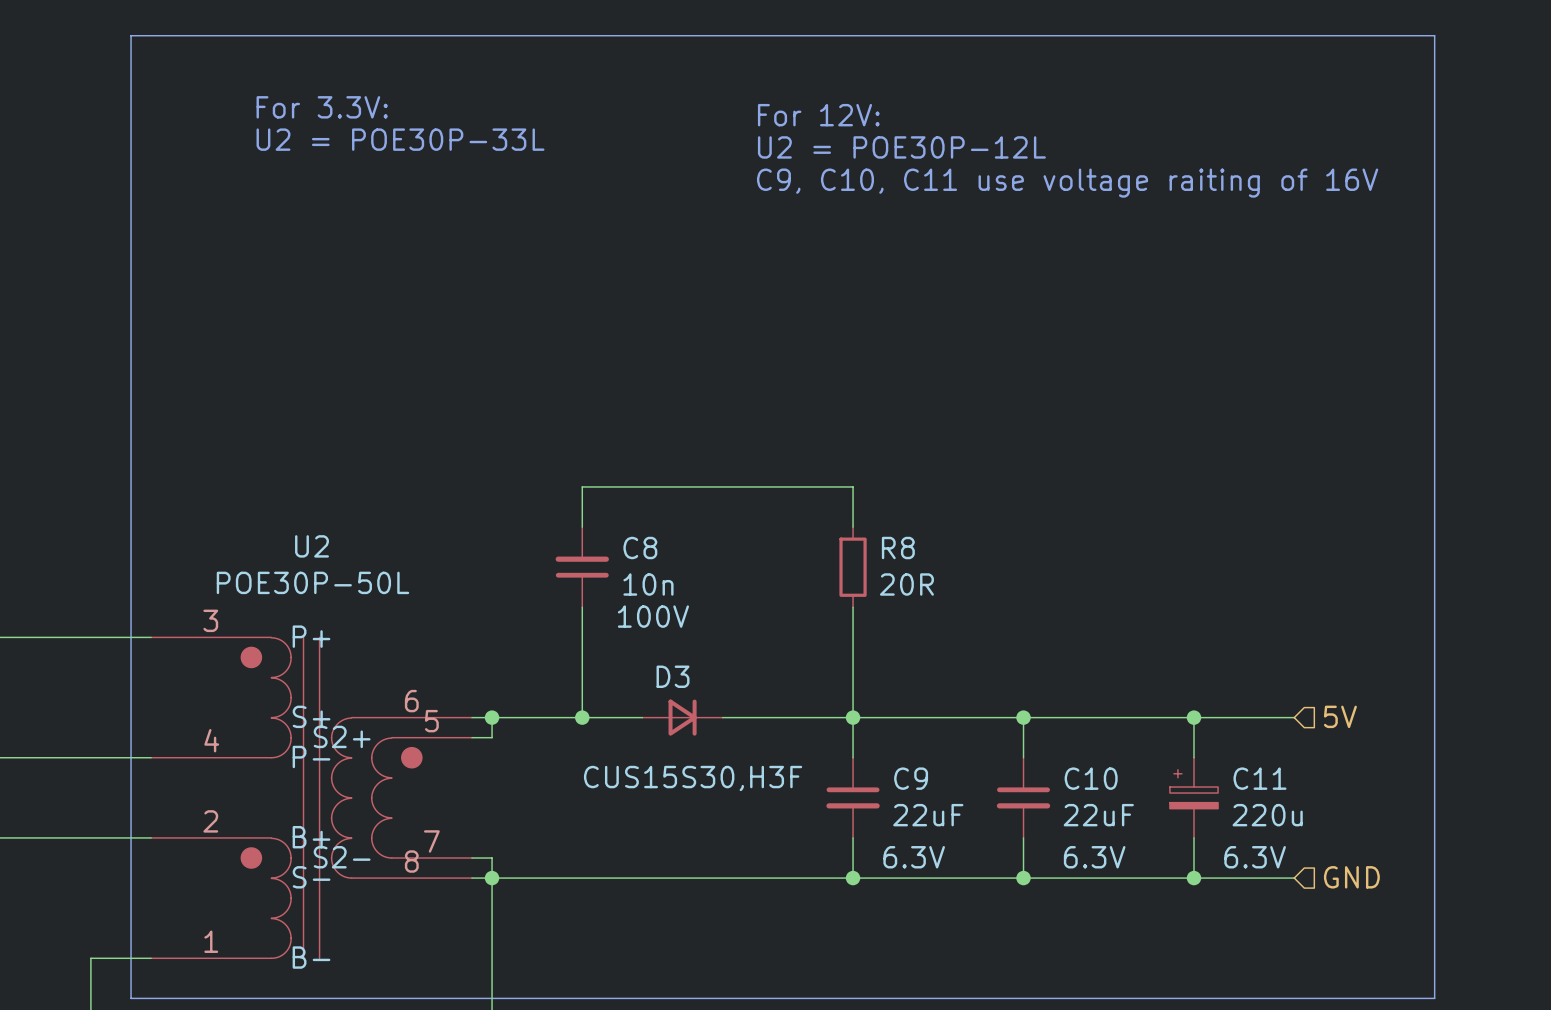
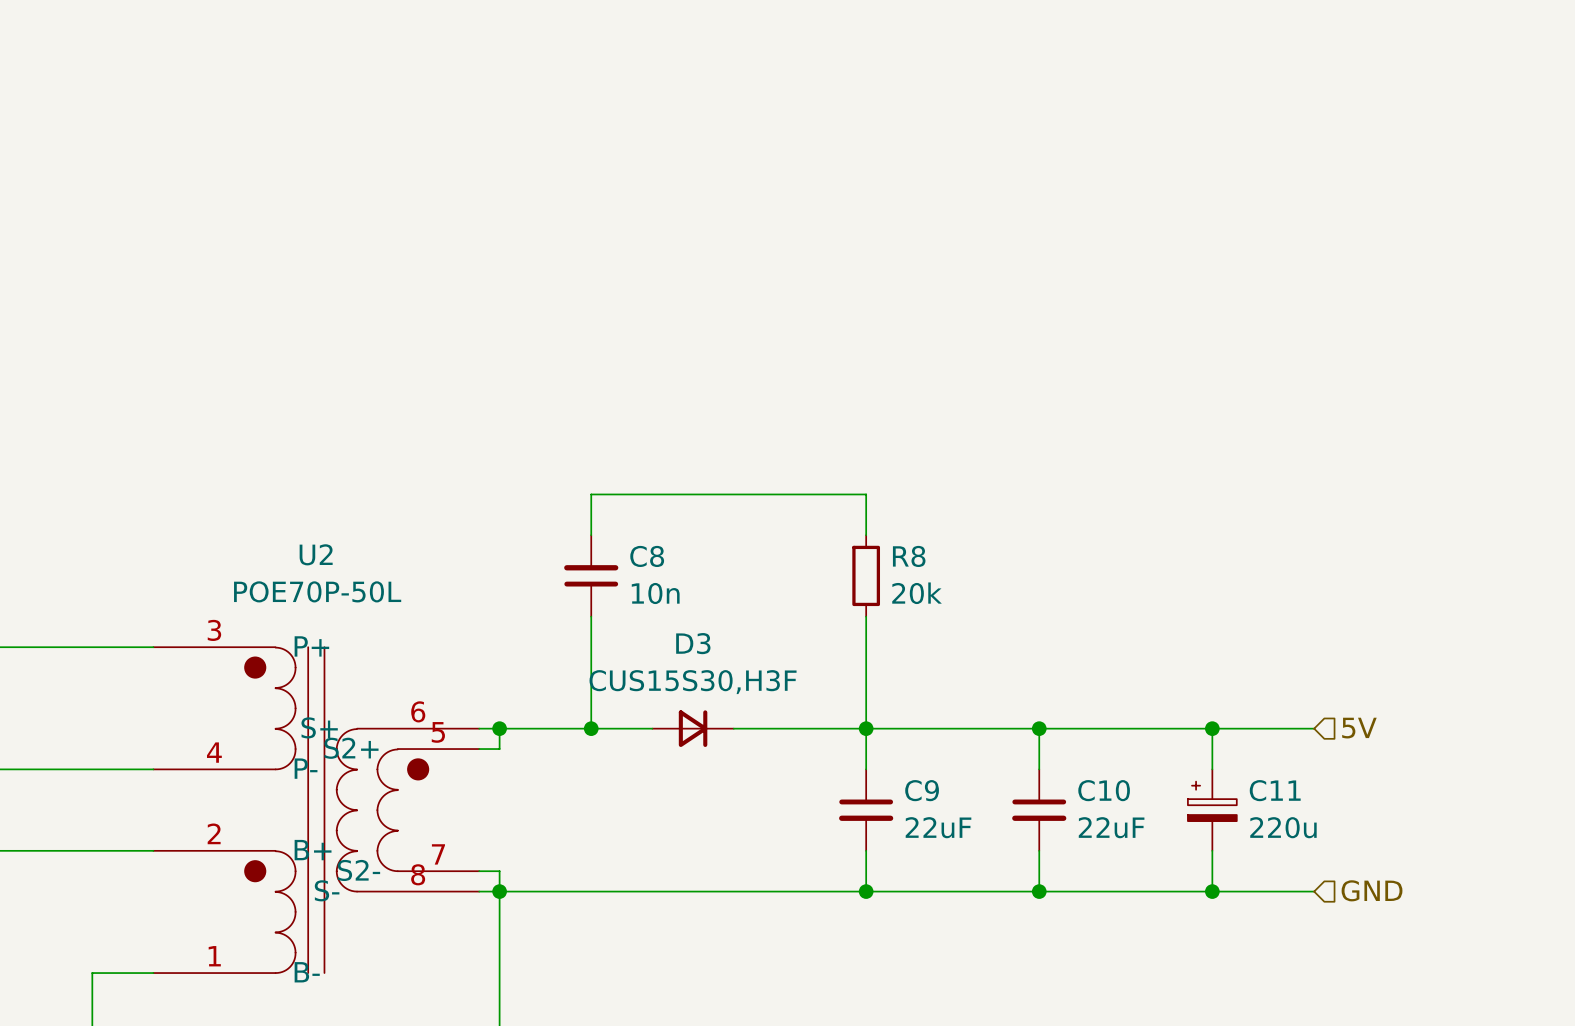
line: (131, 35) (1434, 35) (1434, 998) (131, 998) (131, 35) -> none
text: For 3.3V: (322, 107) -> none
text: For 12V: (818, 115) -> none
text: U2 = POE30P-33L (400, 139) -> none
text: U2 = POE30P-12L (901, 147) -> none
text: C9, C10, C11 use voltage raiting of 16V (1067, 183) -> none
U2 value: POE30P-50L (312, 582) -> POE70P-50L (317, 591)
R8 value: 20R (906, 584) -> 20k (917, 593)
C8 text: 100V (653, 616) -> none
D3 name position: D3 (673, 676) -> D3 (693, 643)
D3 value position: CUS15S30,H3F (693, 778) -> CUS15S30,H3F (693, 682)
C9 text: 6.3V (914, 857) -> none
C10 text: 6.3V (1094, 857) -> none
C11 text: 6.3V (1255, 857) -> none

